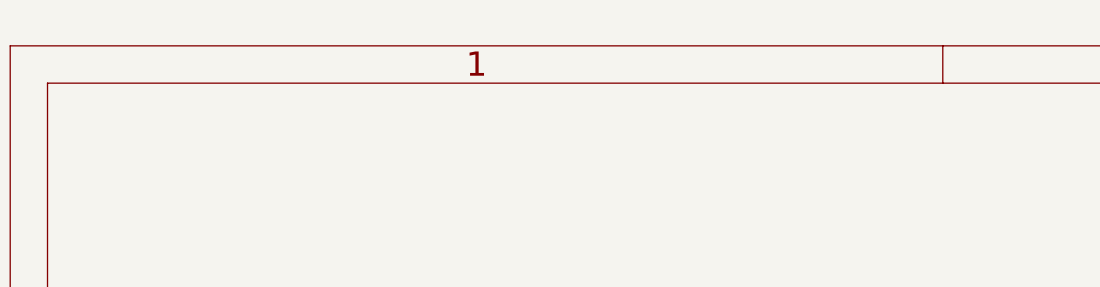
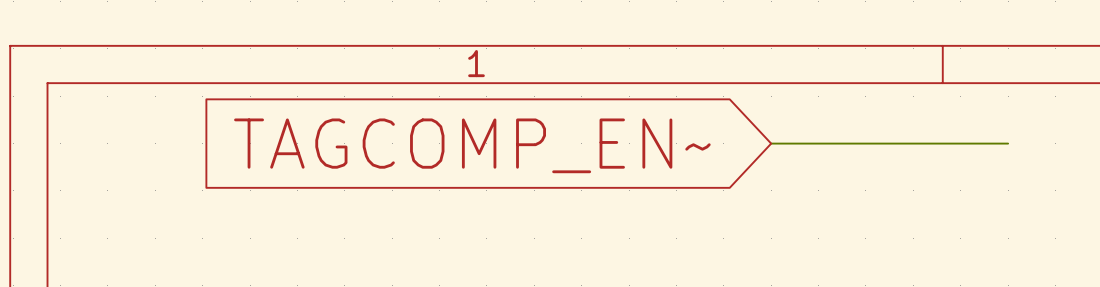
wire: none -> (771, 143) (1008, 143)
global label: none -> TAGCOMP_EN~ (472, 145)

